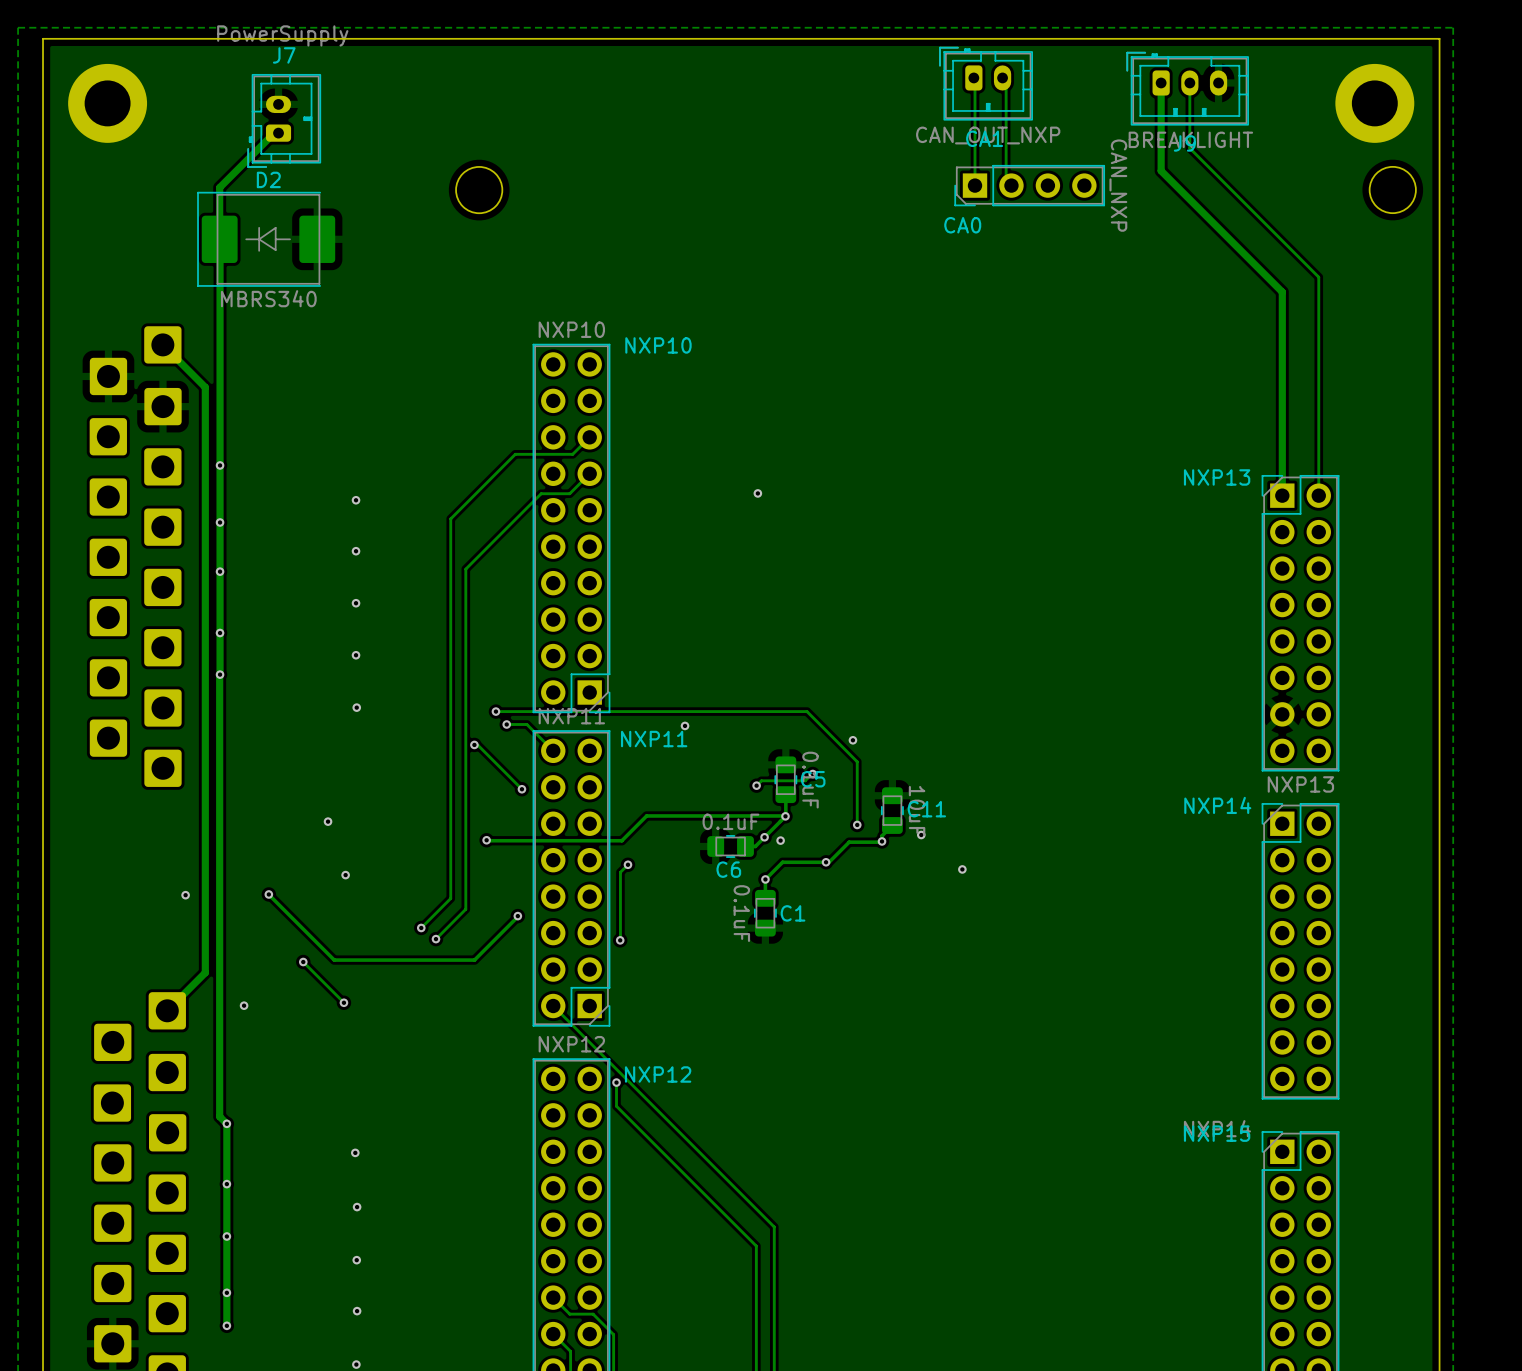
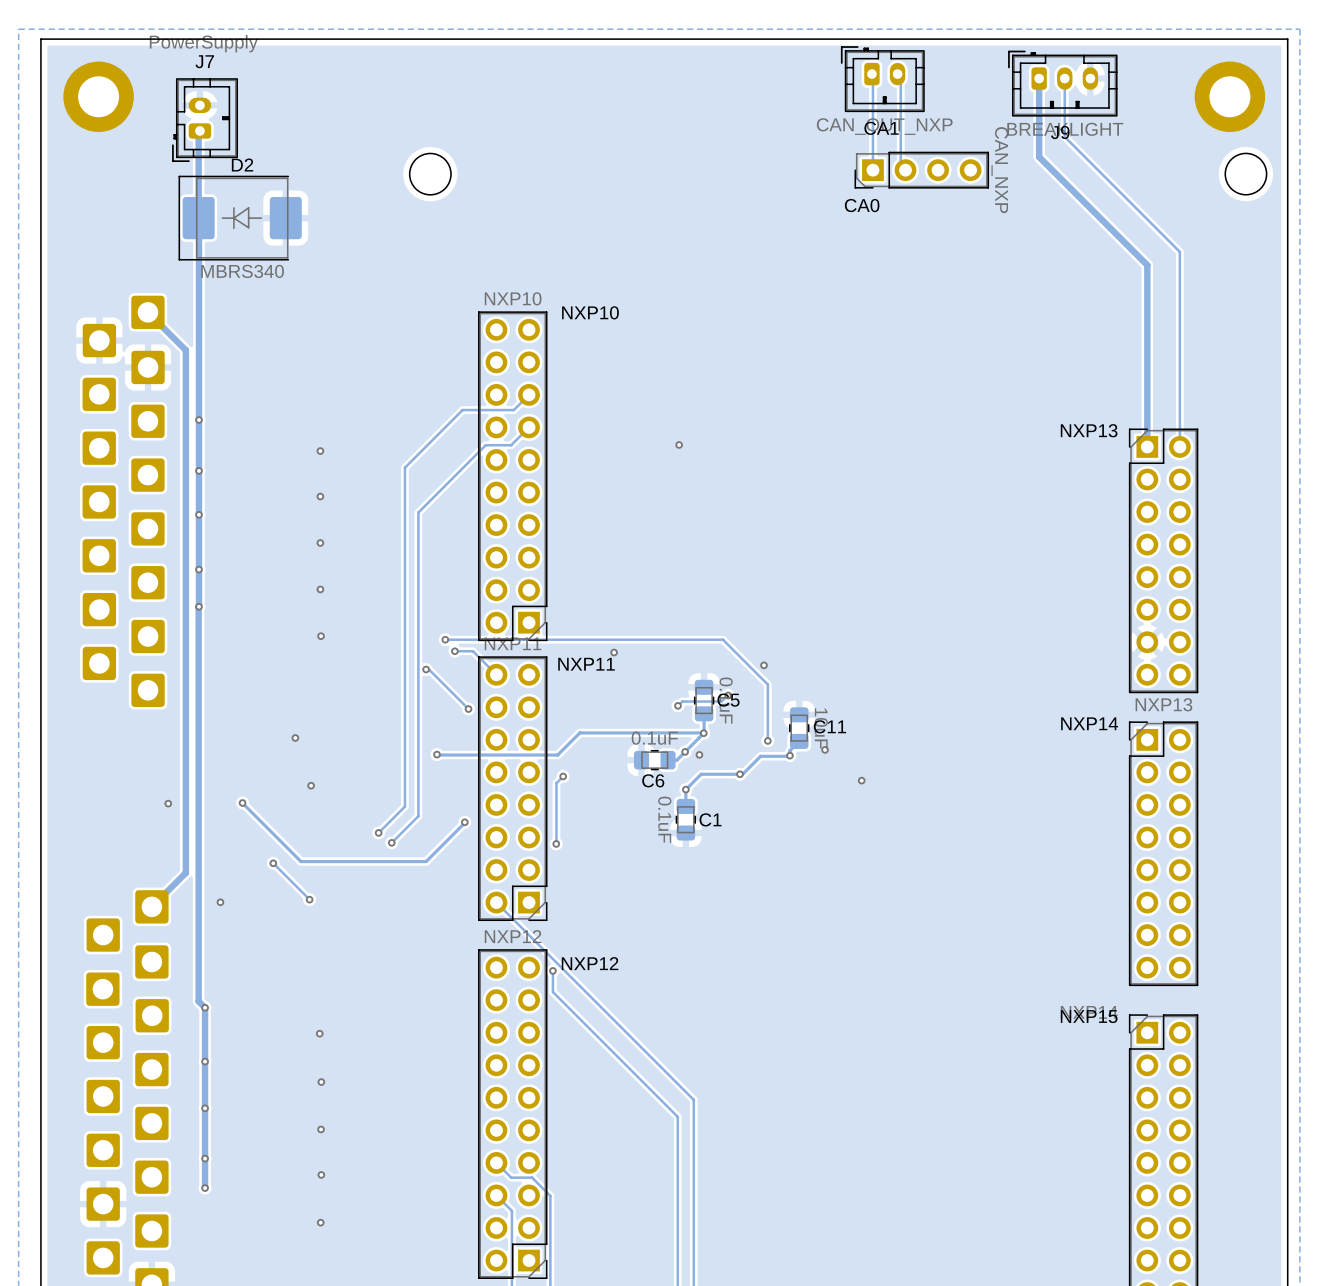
J7 position: (284, 120) -> (205, 120)
track: (278, 133) (274, 133) (219, 187) -> (199, 130) (198, 171)

